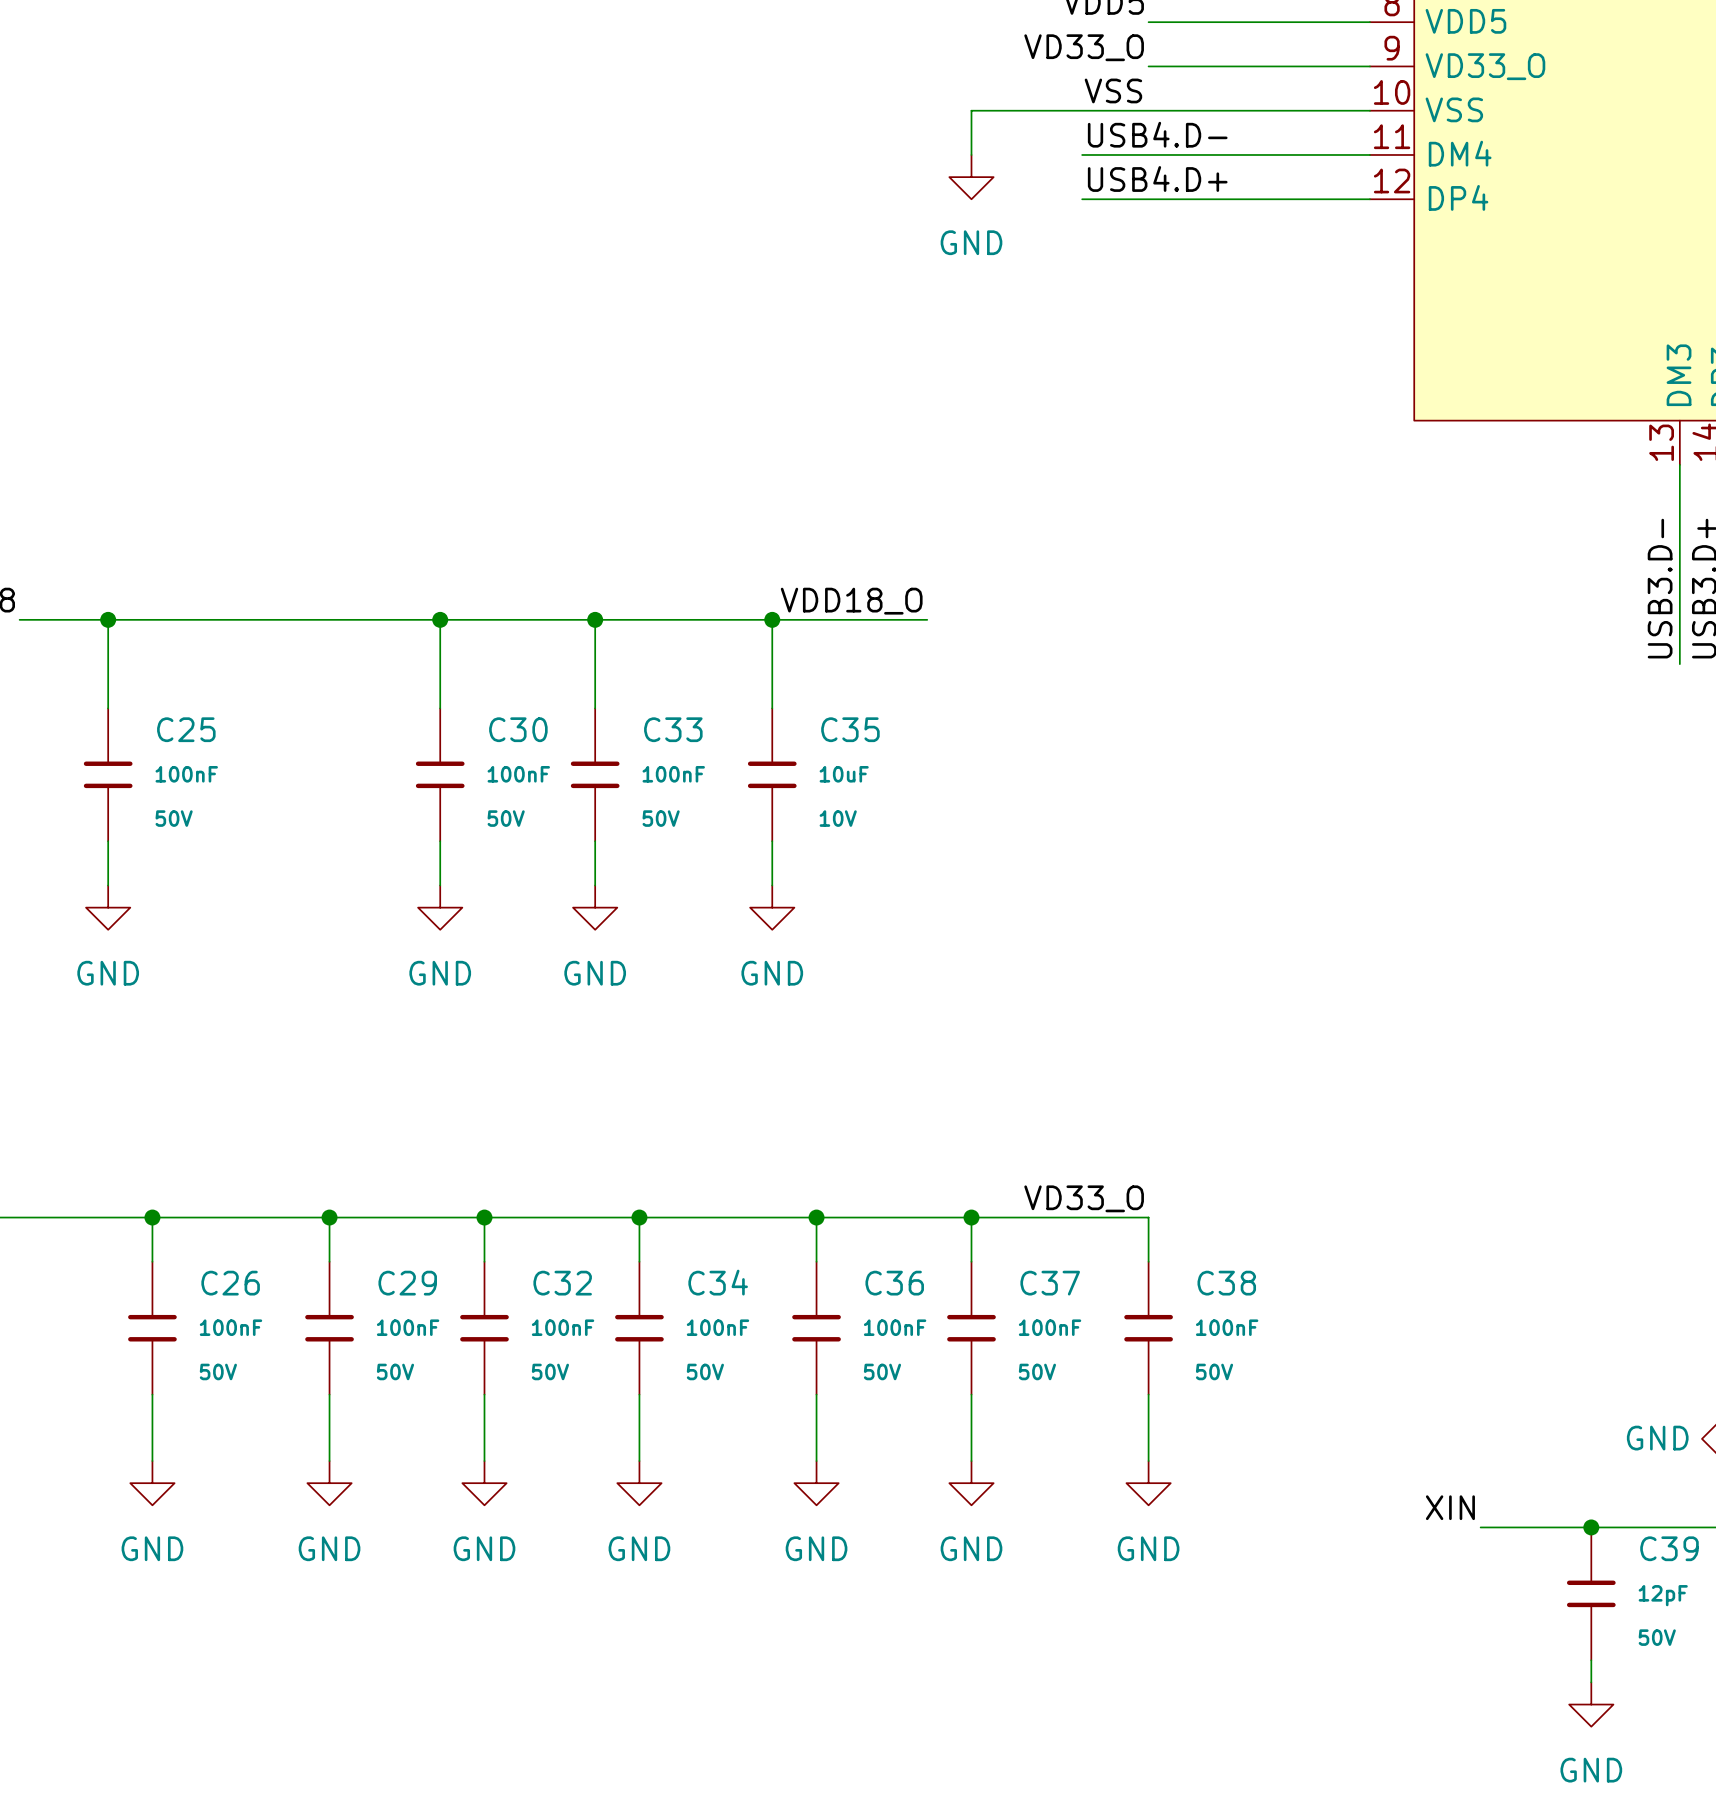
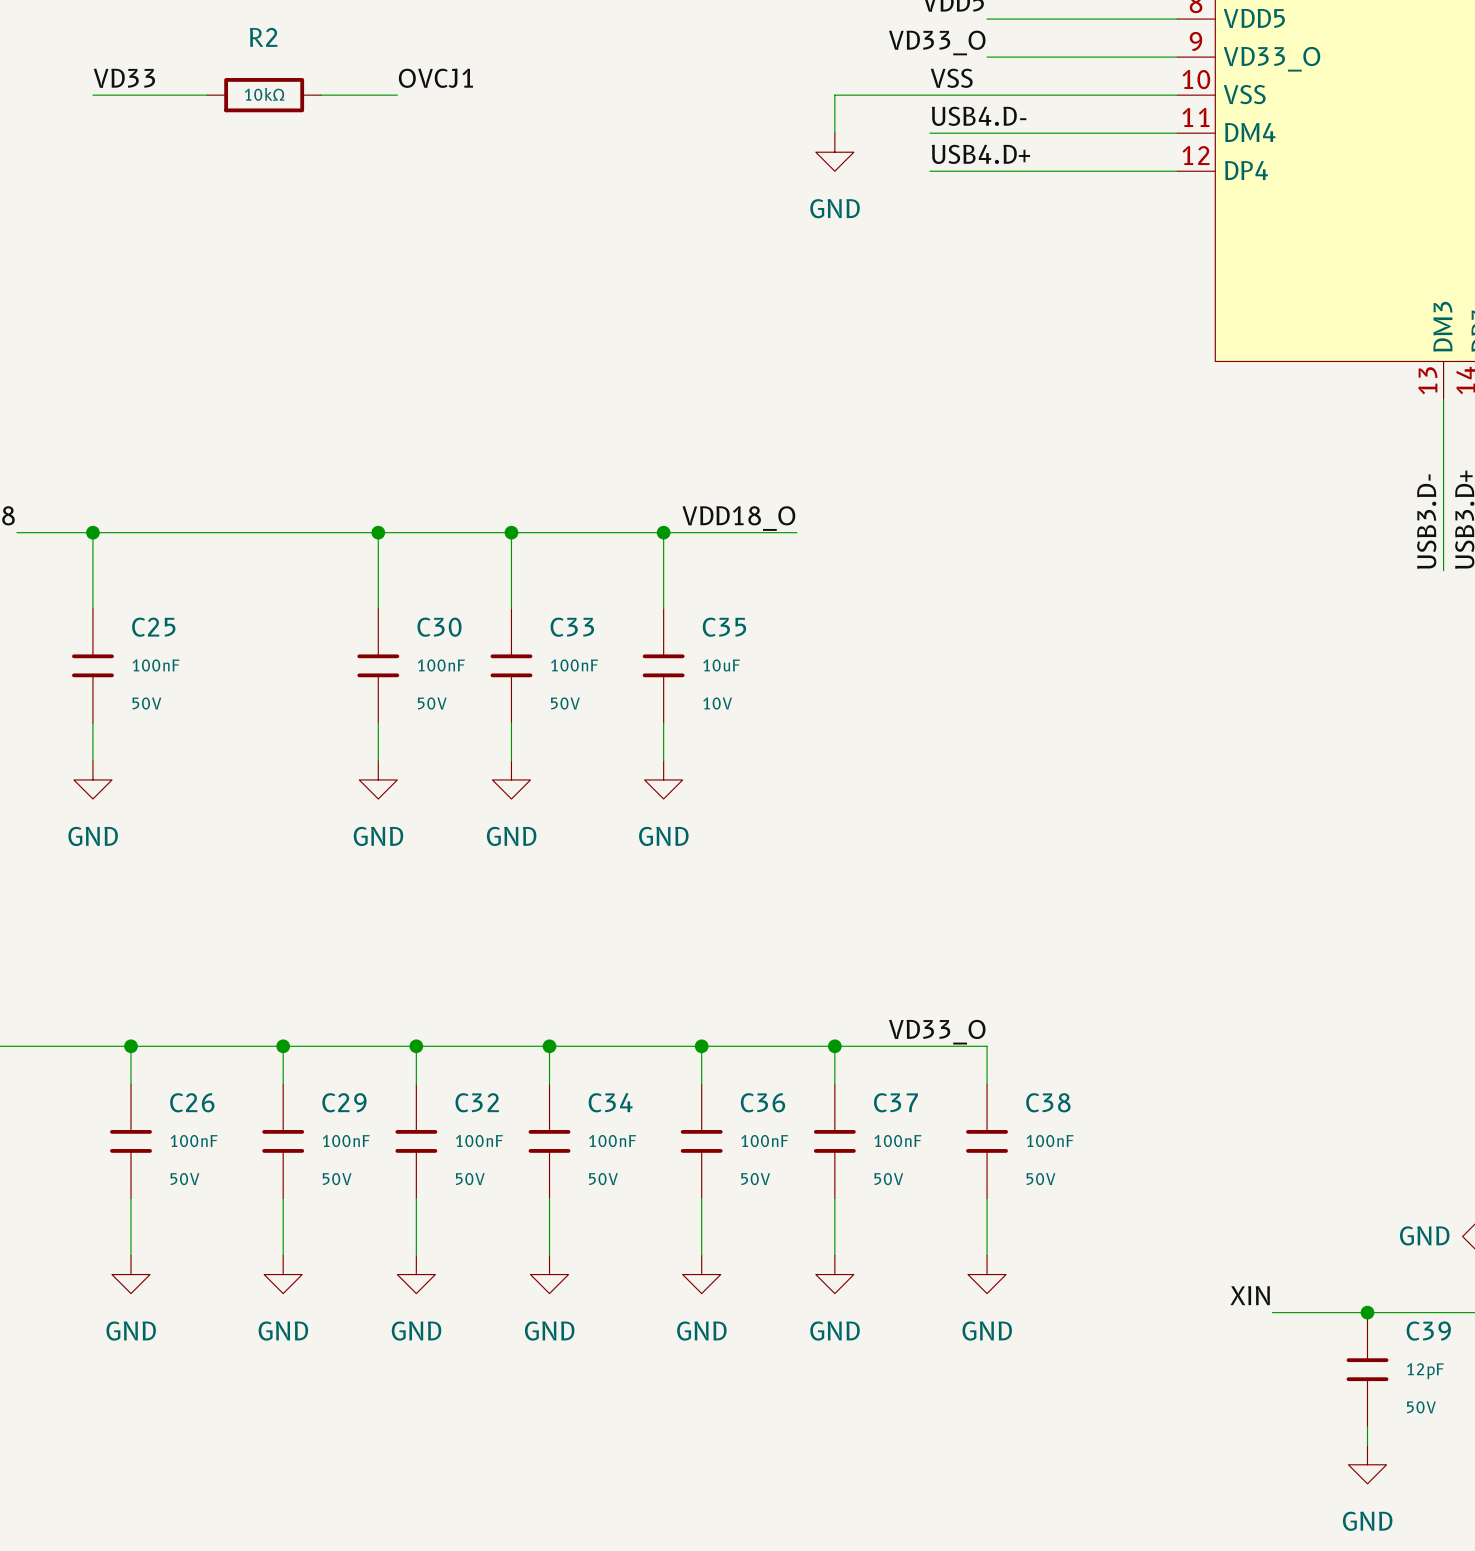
label: none -> VD33 (124, 78)
label: none -> OVCJ1 (435, 78)
wire: none -> (92, 95) (207, 95)
R2: none -> 10kΩ (264, 95)
wire: none -> (321, 95) (397, 95)

